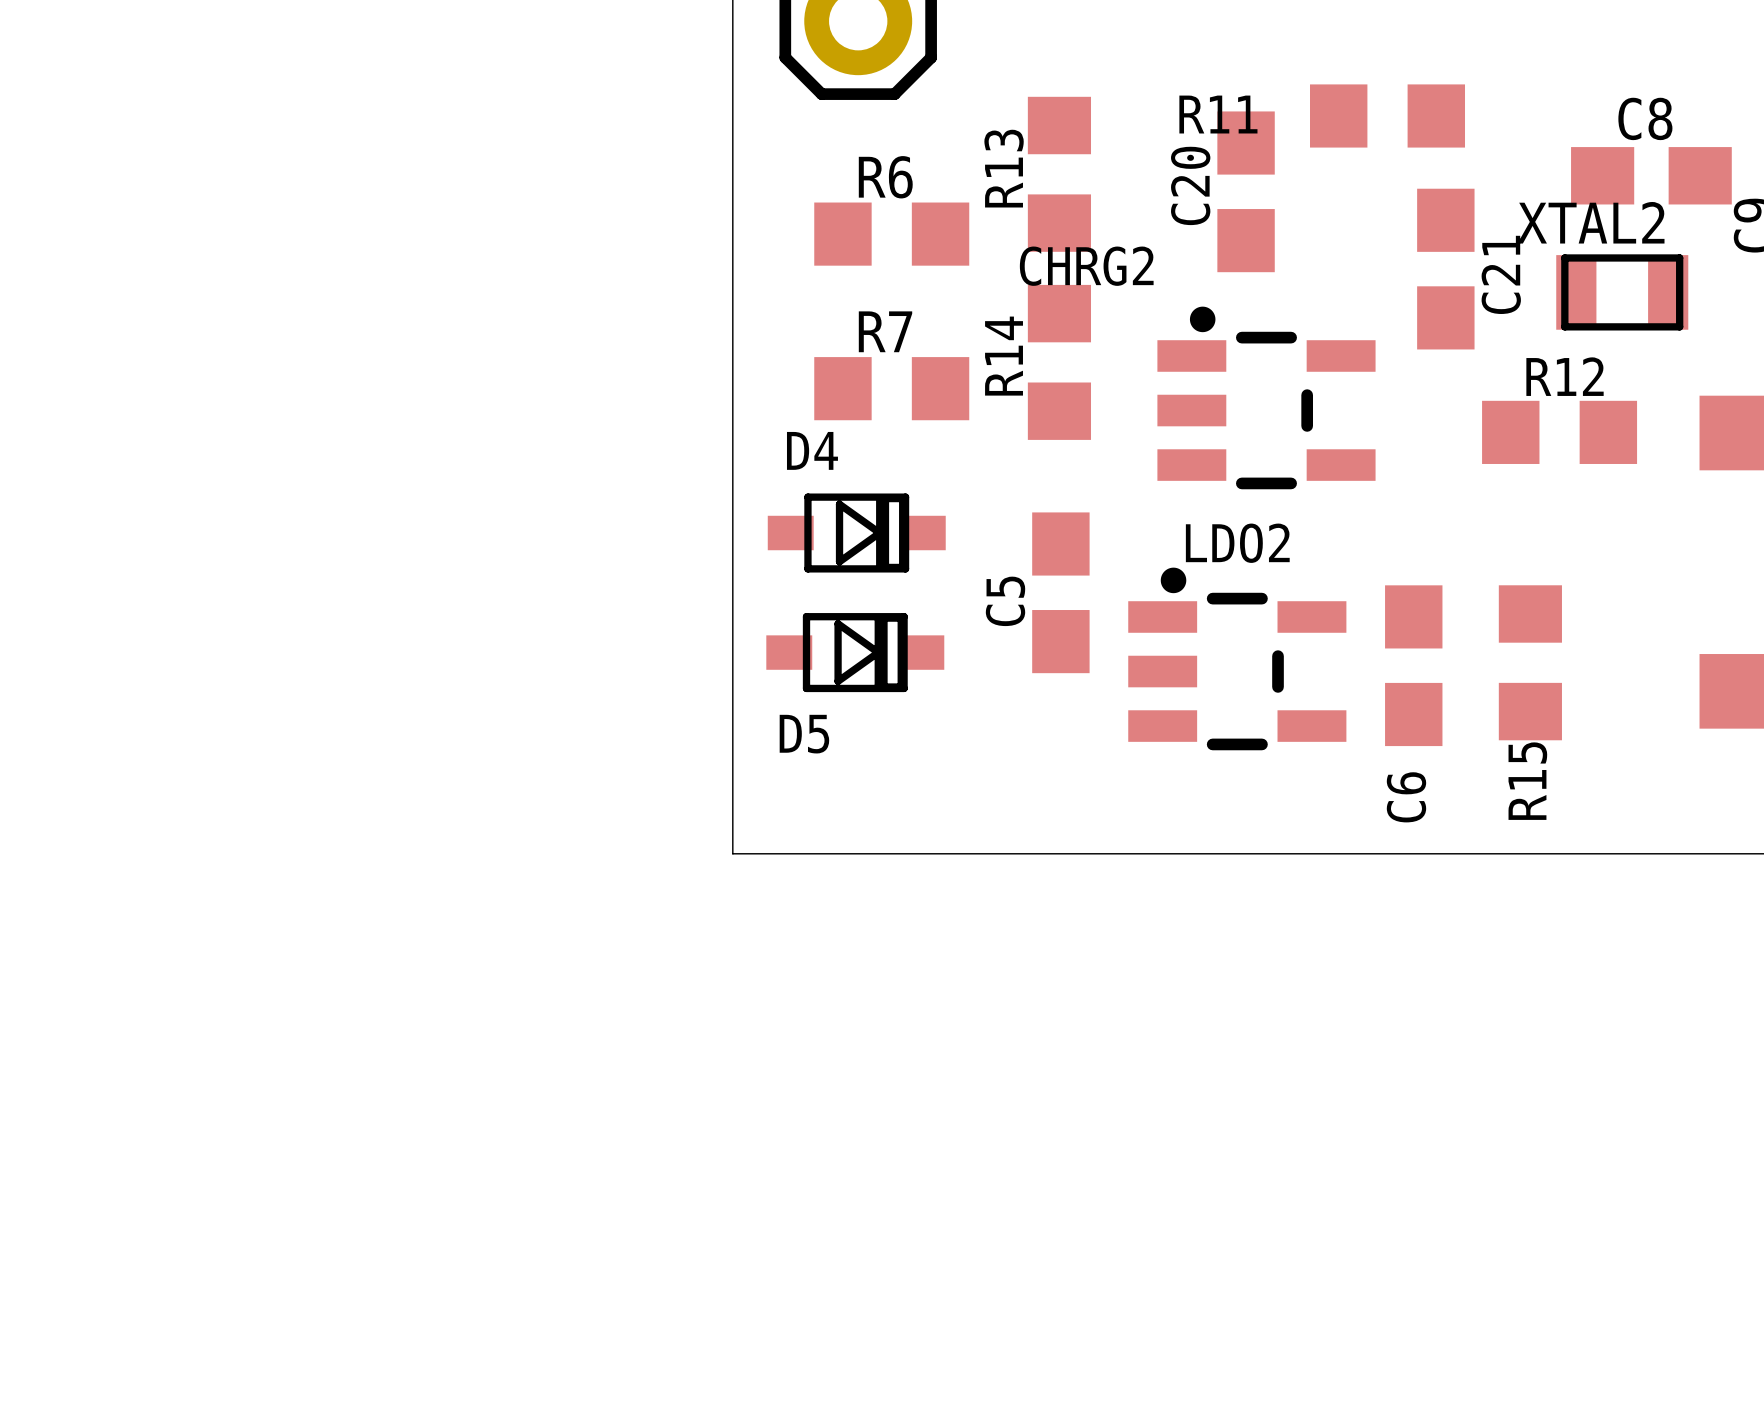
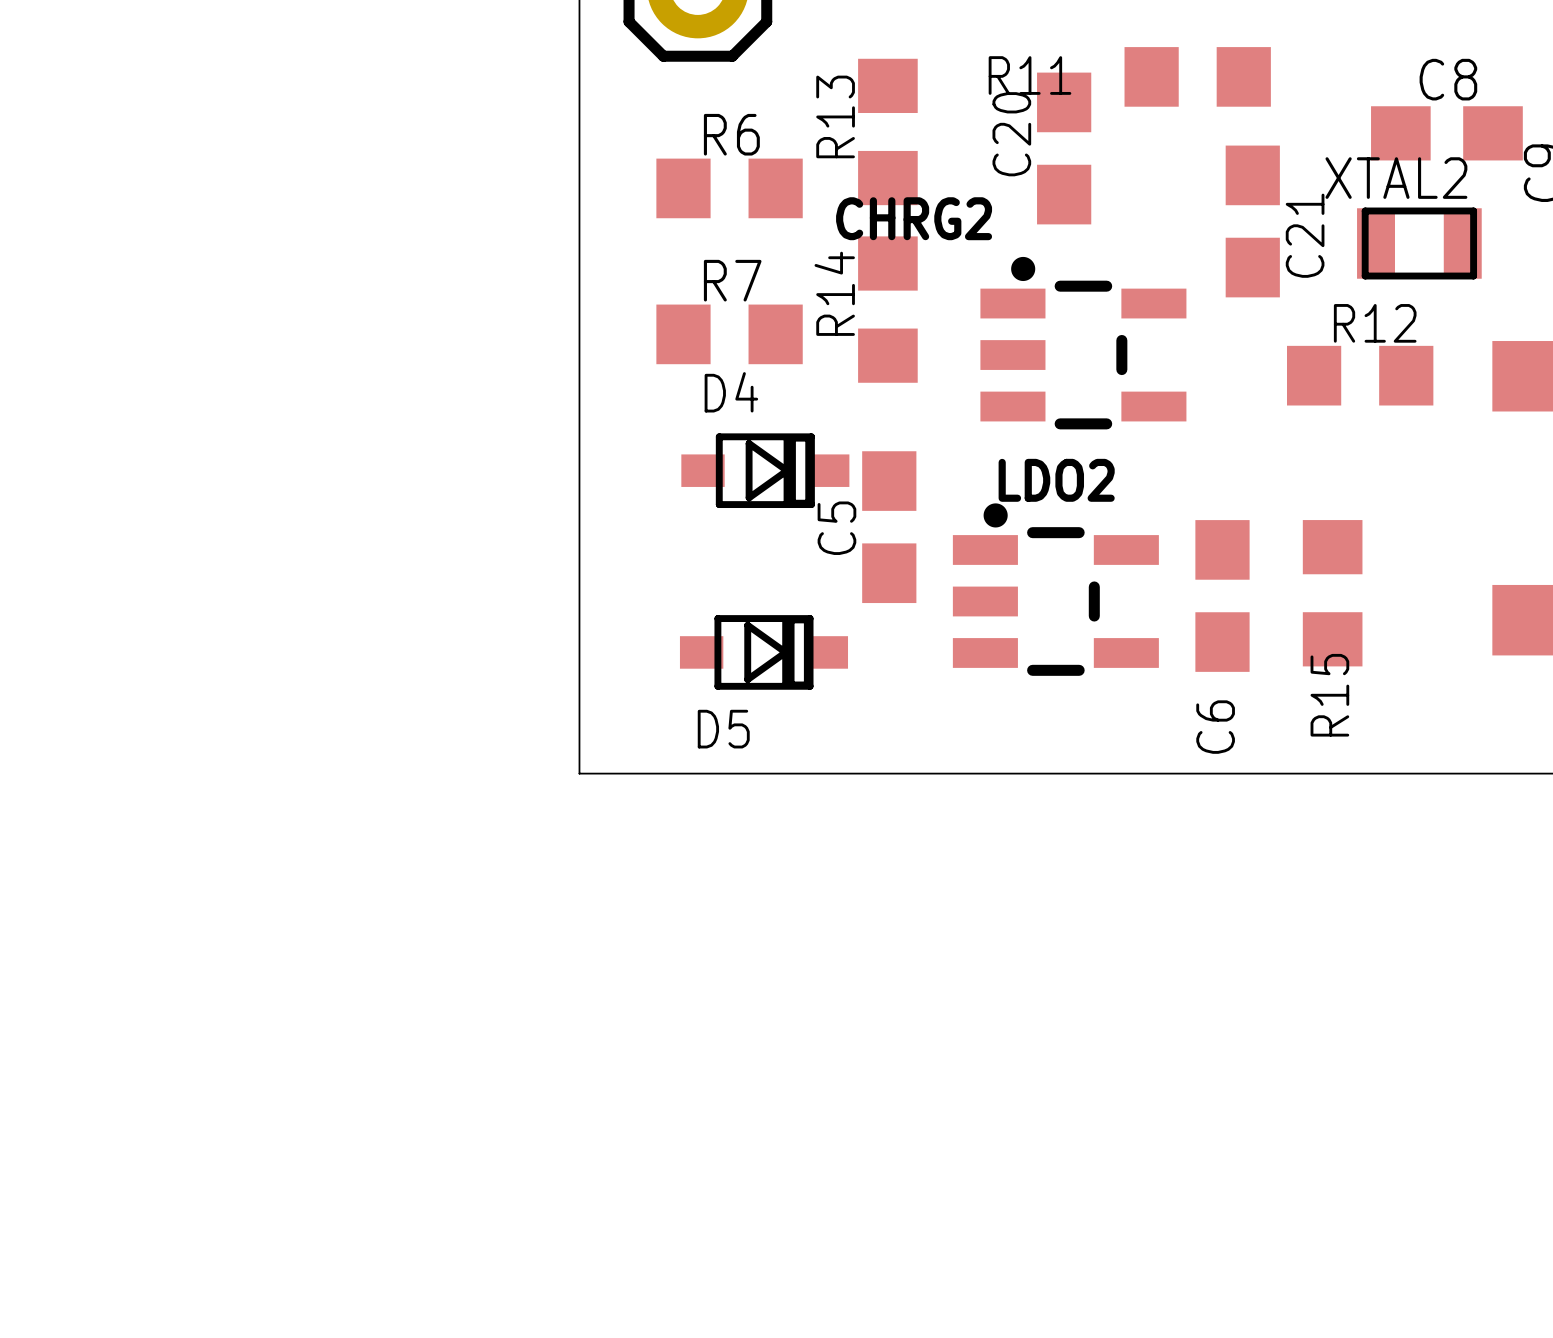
D4 position: (856, 533) -> (765, 470)
D5 position: (855, 652) -> (763, 652)

